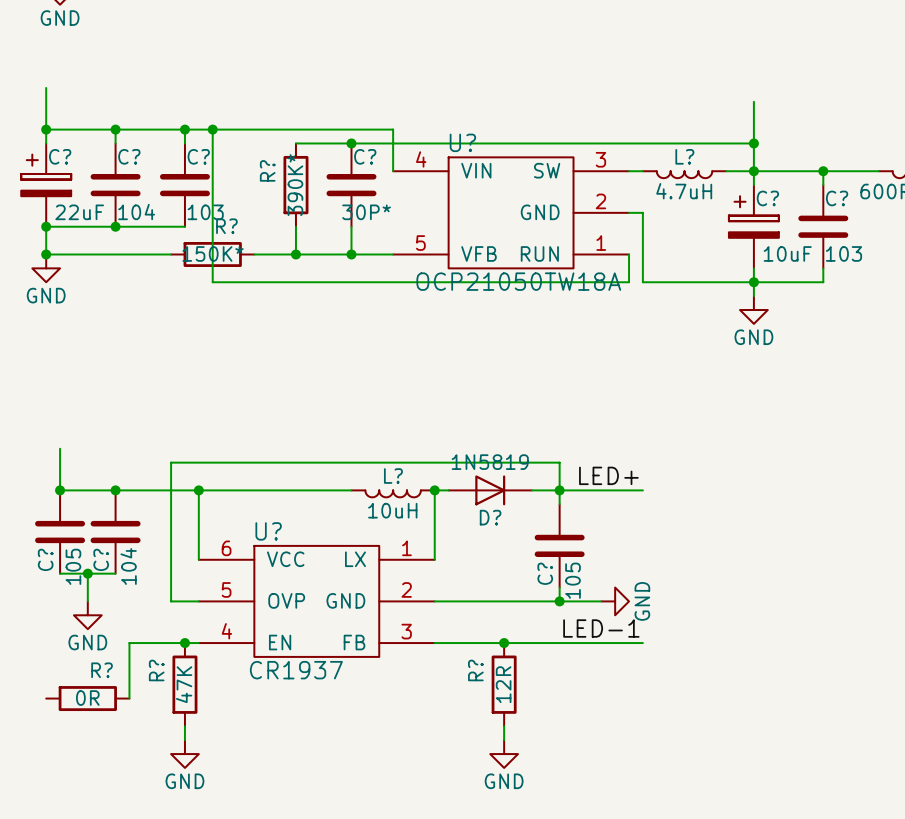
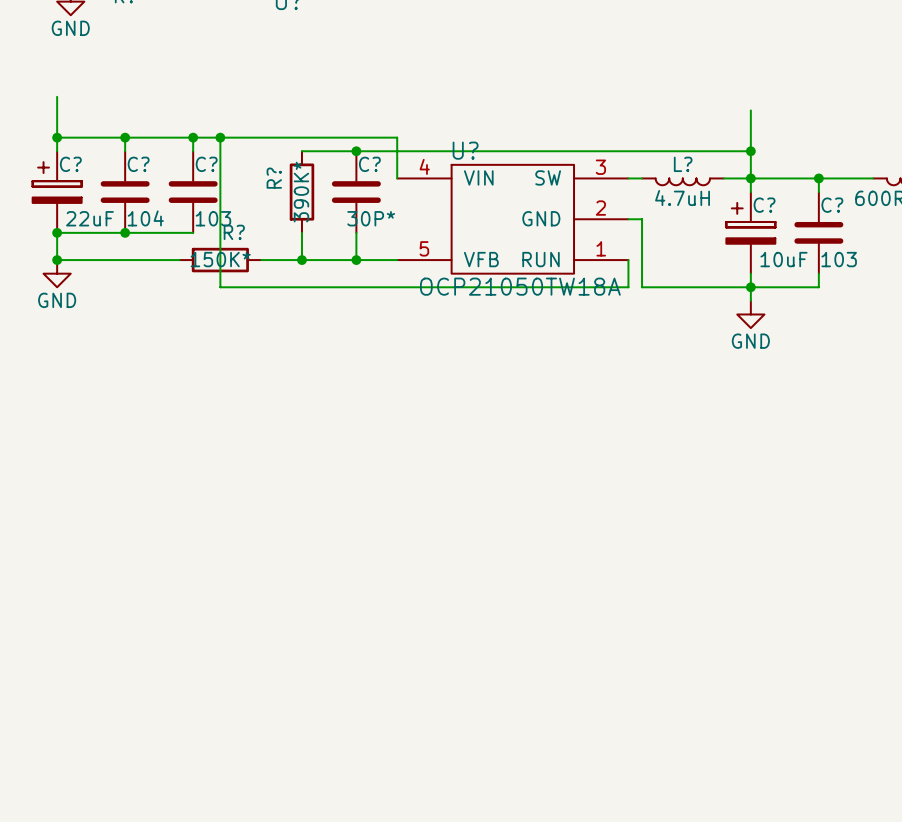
wire: (60, 448) (60, 490) (351, 490) -> none
label: LED+ (608, 475) -> none
junction: (60, 490) -> none
junction: (115, 490) -> none
wire: (198, 490) (198, 559) -> none
junction: (198, 490) -> none
junction: (434, 490) -> none
wire: (448, 490) (434, 490) (434, 559) -> none
D?: 1N5819 (490, 490) -> none
wire: (531, 490) (642, 490) -> none
junction: (559, 490) -> none
L?: 10uH (393, 493) -> none
wire: (559, 504) (559, 462) (171, 462) (171, 601) (198, 601) -> none
C?: 105 (60, 532) -> none
C?: 104 (115, 532) -> none
C?: 105 (559, 545) -> none
wire: (60, 573) (115, 573) -> none
wire: (87, 573) (87, 601) -> none
junction: (87, 573) -> none
wire: (559, 587) (559, 601) -> none
U?: CR1937 (316, 601) -> none
wire: (434, 601) (601, 601) -> none
junction: (559, 601) -> none
power symbol: GND (615, 601) -> none
power symbol: GND (87, 615) -> none
label: LED-1 (601, 628) -> none
junction: (184, 643) -> none
wire: (198, 643) (129, 643) (129, 698) -> none
wire: (434, 643) (642, 643) -> none
junction: (504, 643) -> none
R?: 47K (184, 684) -> none
R?: 12R (504, 684) -> none
R?: 0R (87, 698) -> none
wire: (184, 726) (184, 740) -> none
wire: (504, 726) (504, 740) -> none
power symbol: GND (184, 754) -> none
power symbol: GND (504, 754) -> none

